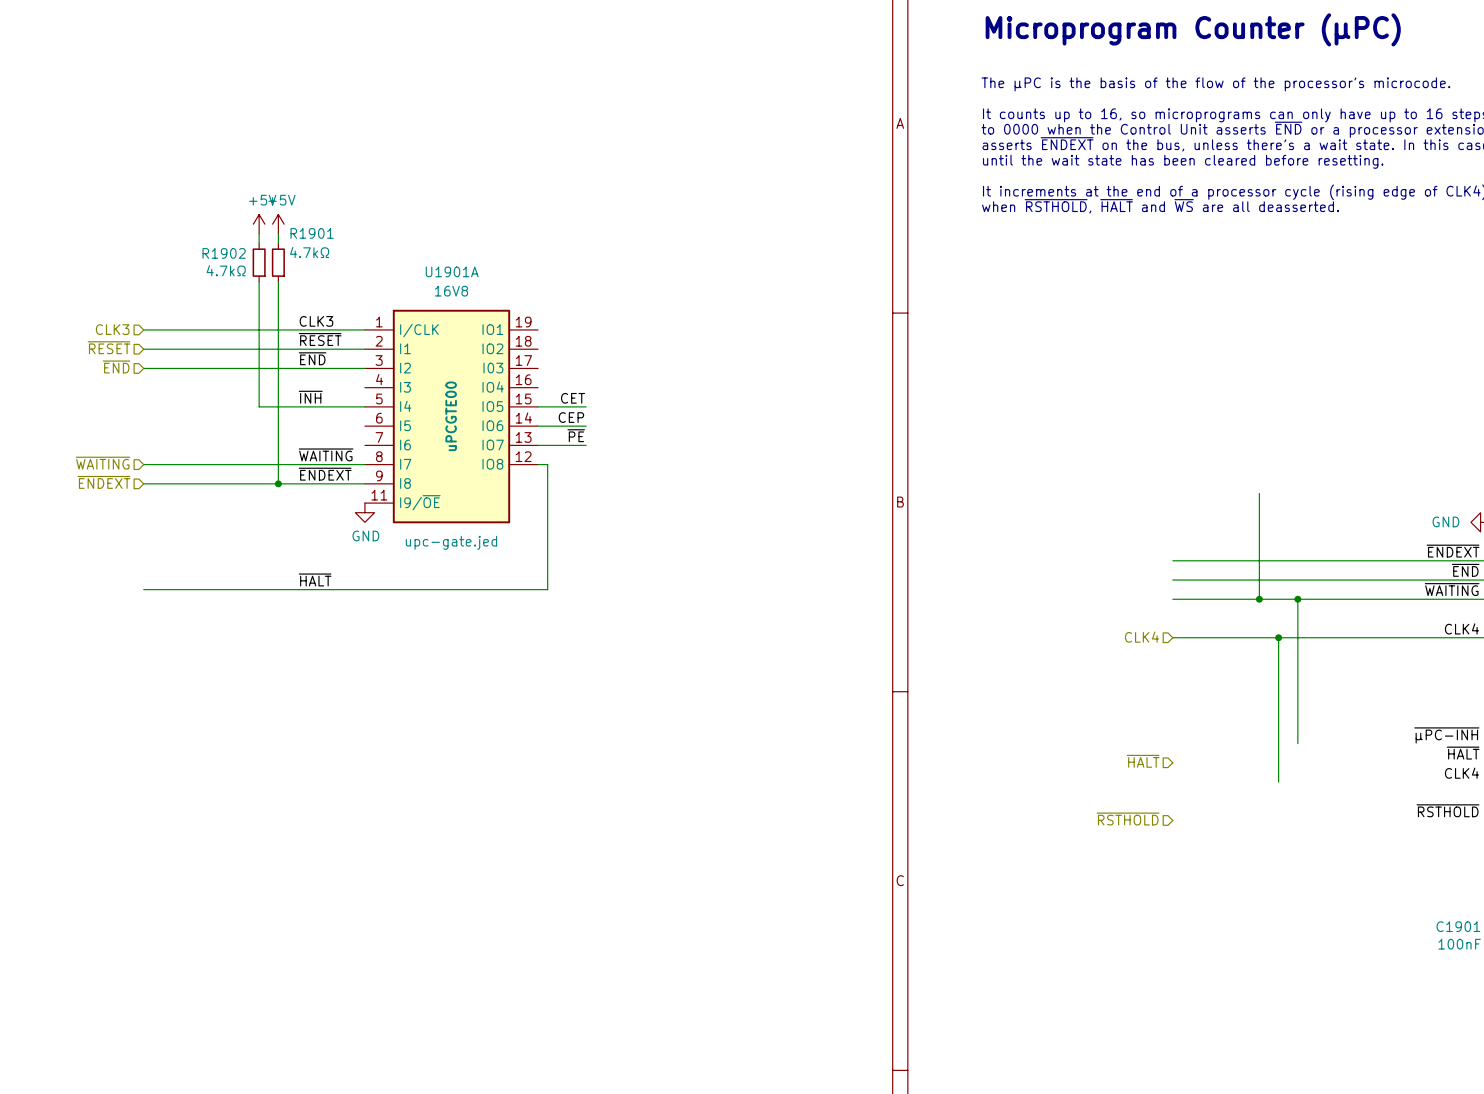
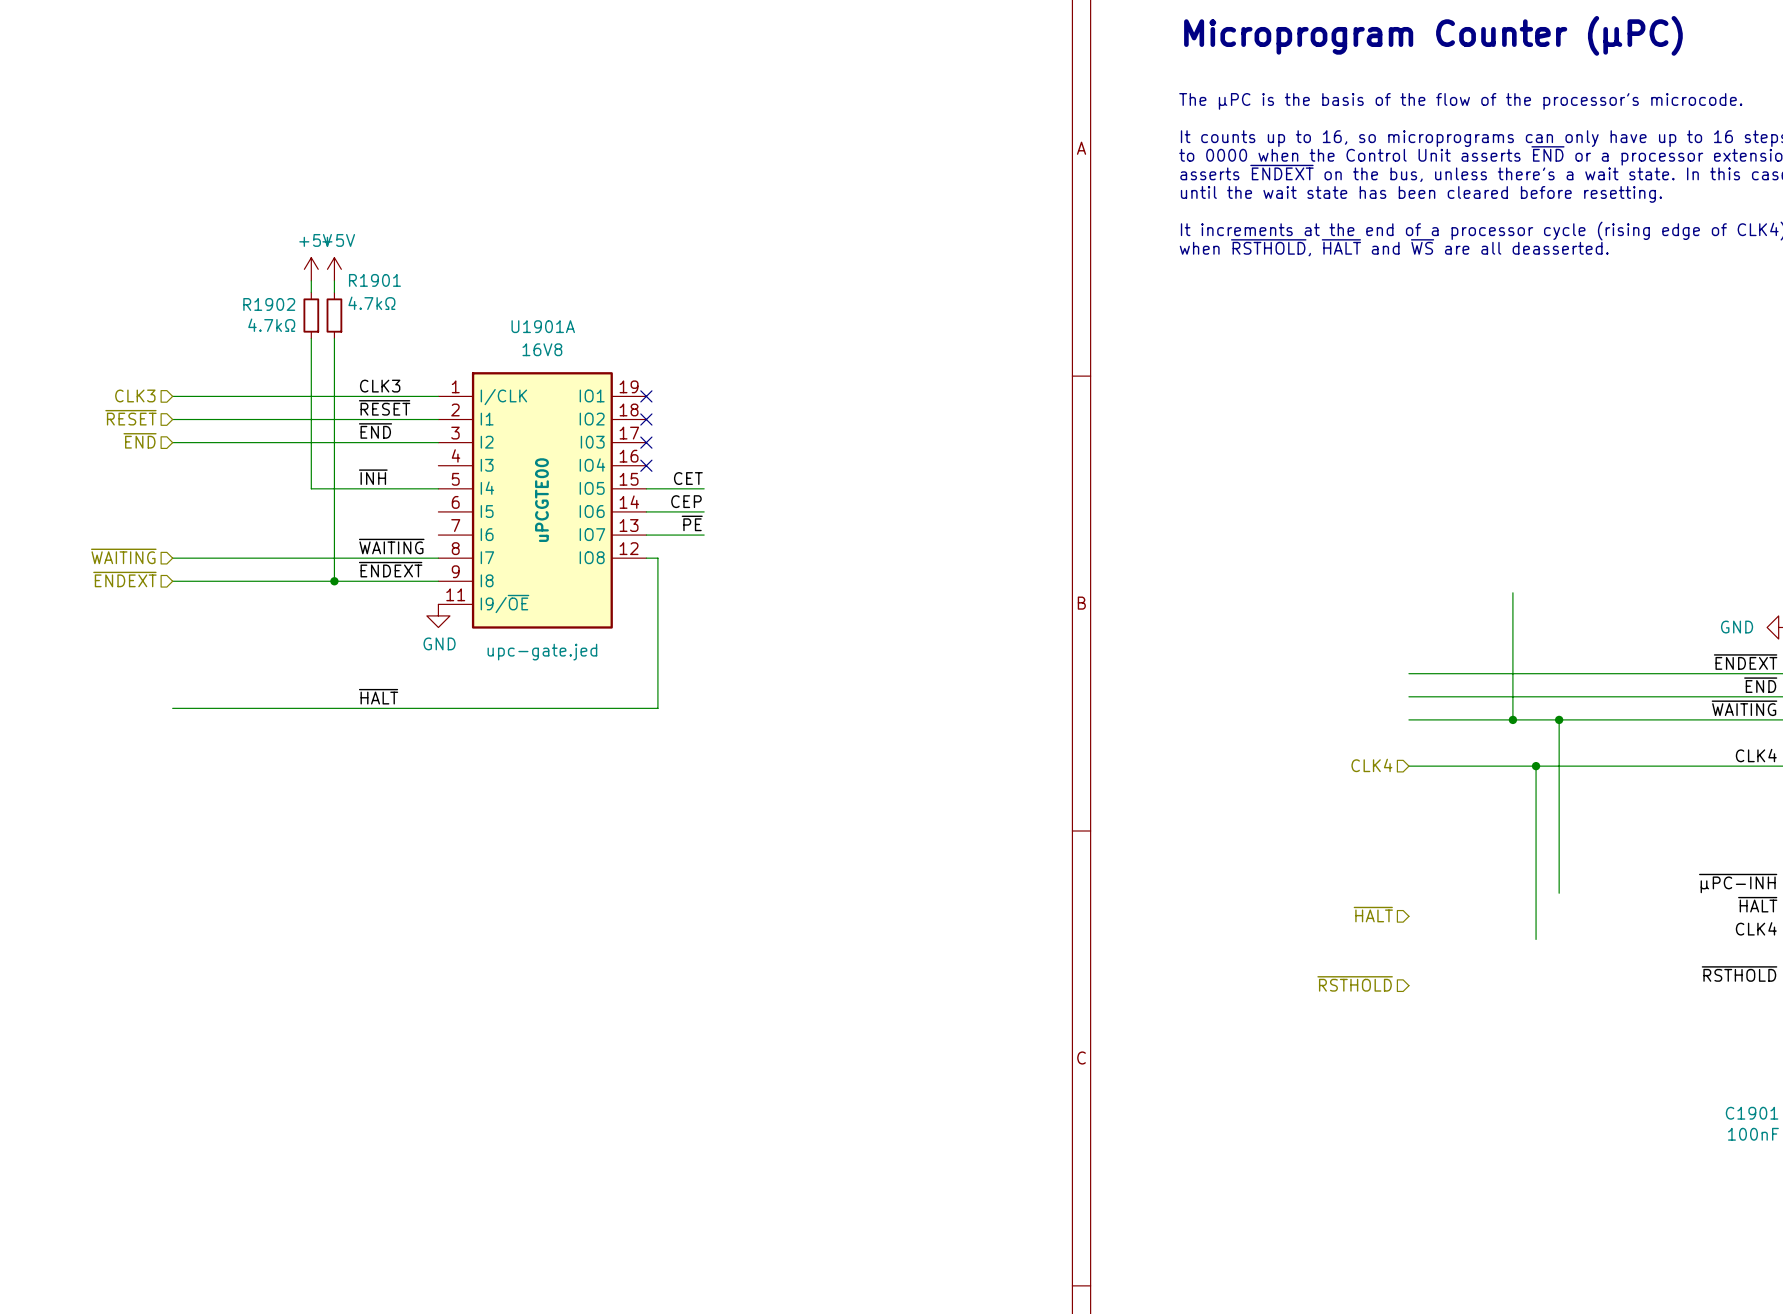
no-connect mark: none -> (646, 396)
no-connect mark: none -> (646, 419)
no-connect mark: none -> (646, 442)
no-connect mark: none -> (646, 465)

